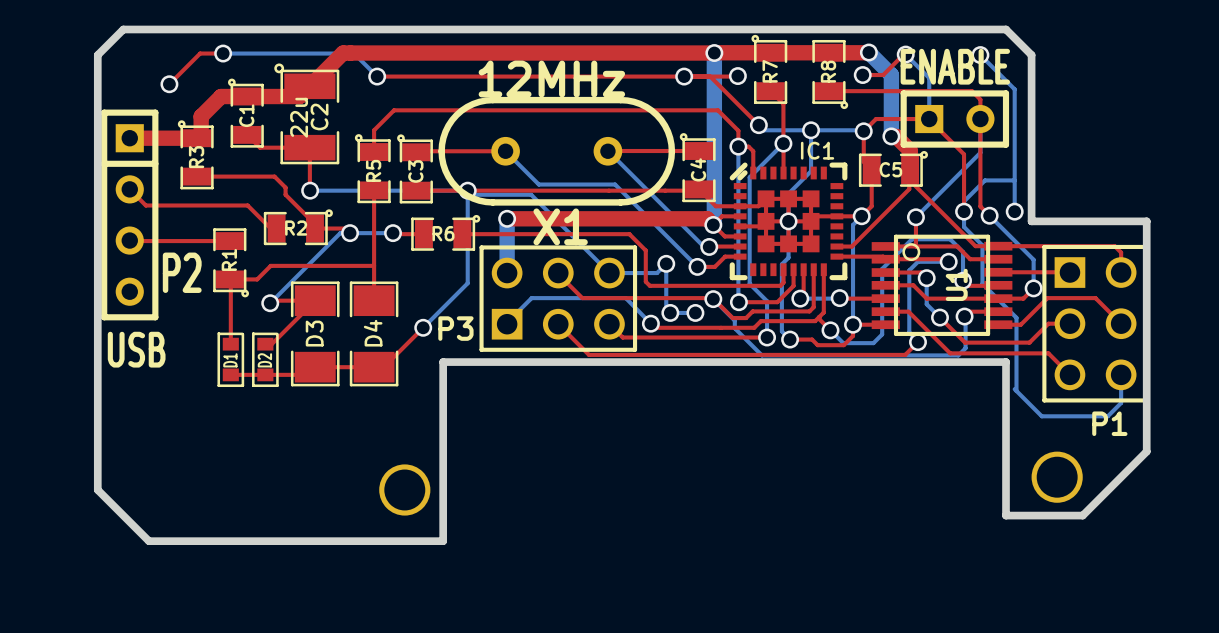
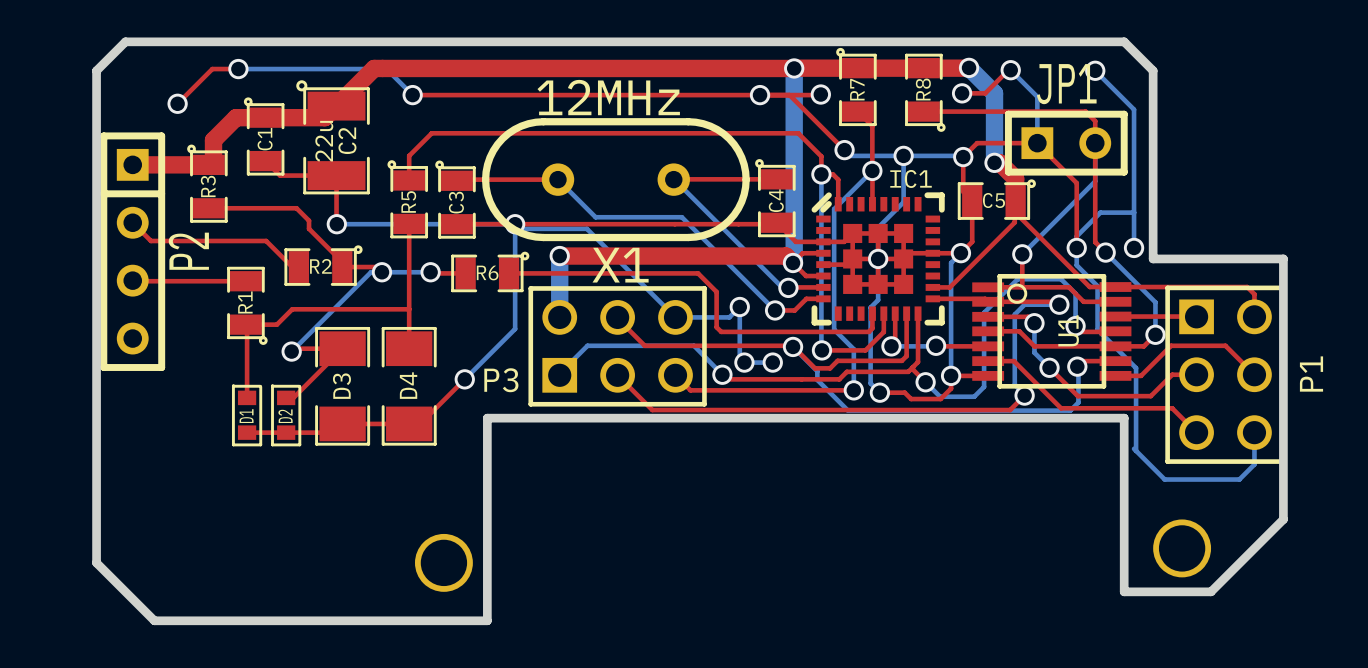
JP1 name: none -> JP1 (1066, 84)
JP1 value: ENABLE (955, 66) -> none
P2 name rotation: 0° (182, 272) -> 90° counterclockwise (188, 251)
P2 value: USB (136, 349) -> none
P1 name rotation: 0° (1109, 423) -> 90° counterclockwise (1311, 374)
P1 name position: P1 (1109, 423) -> P1 (1311, 374)

